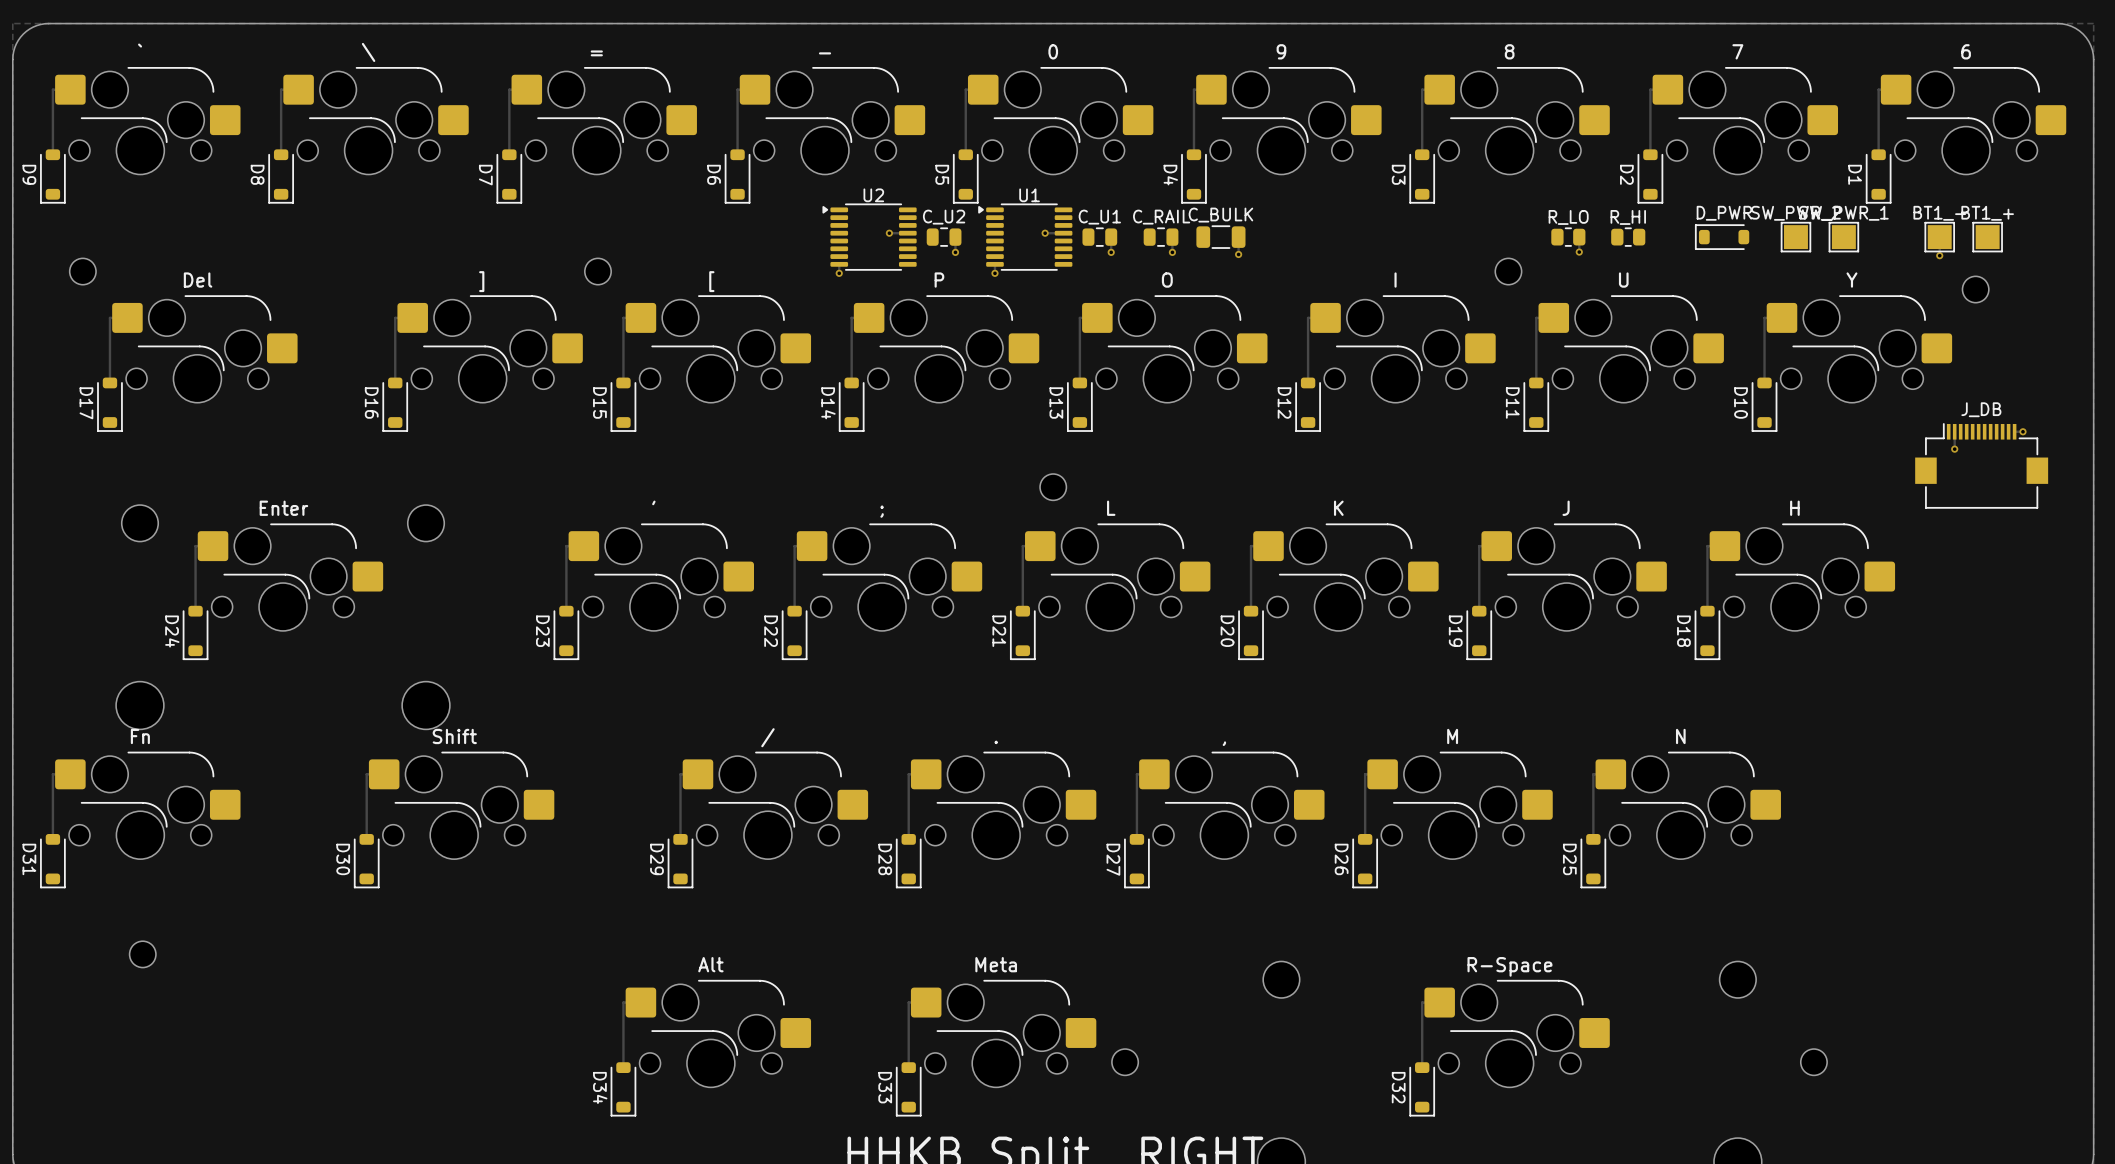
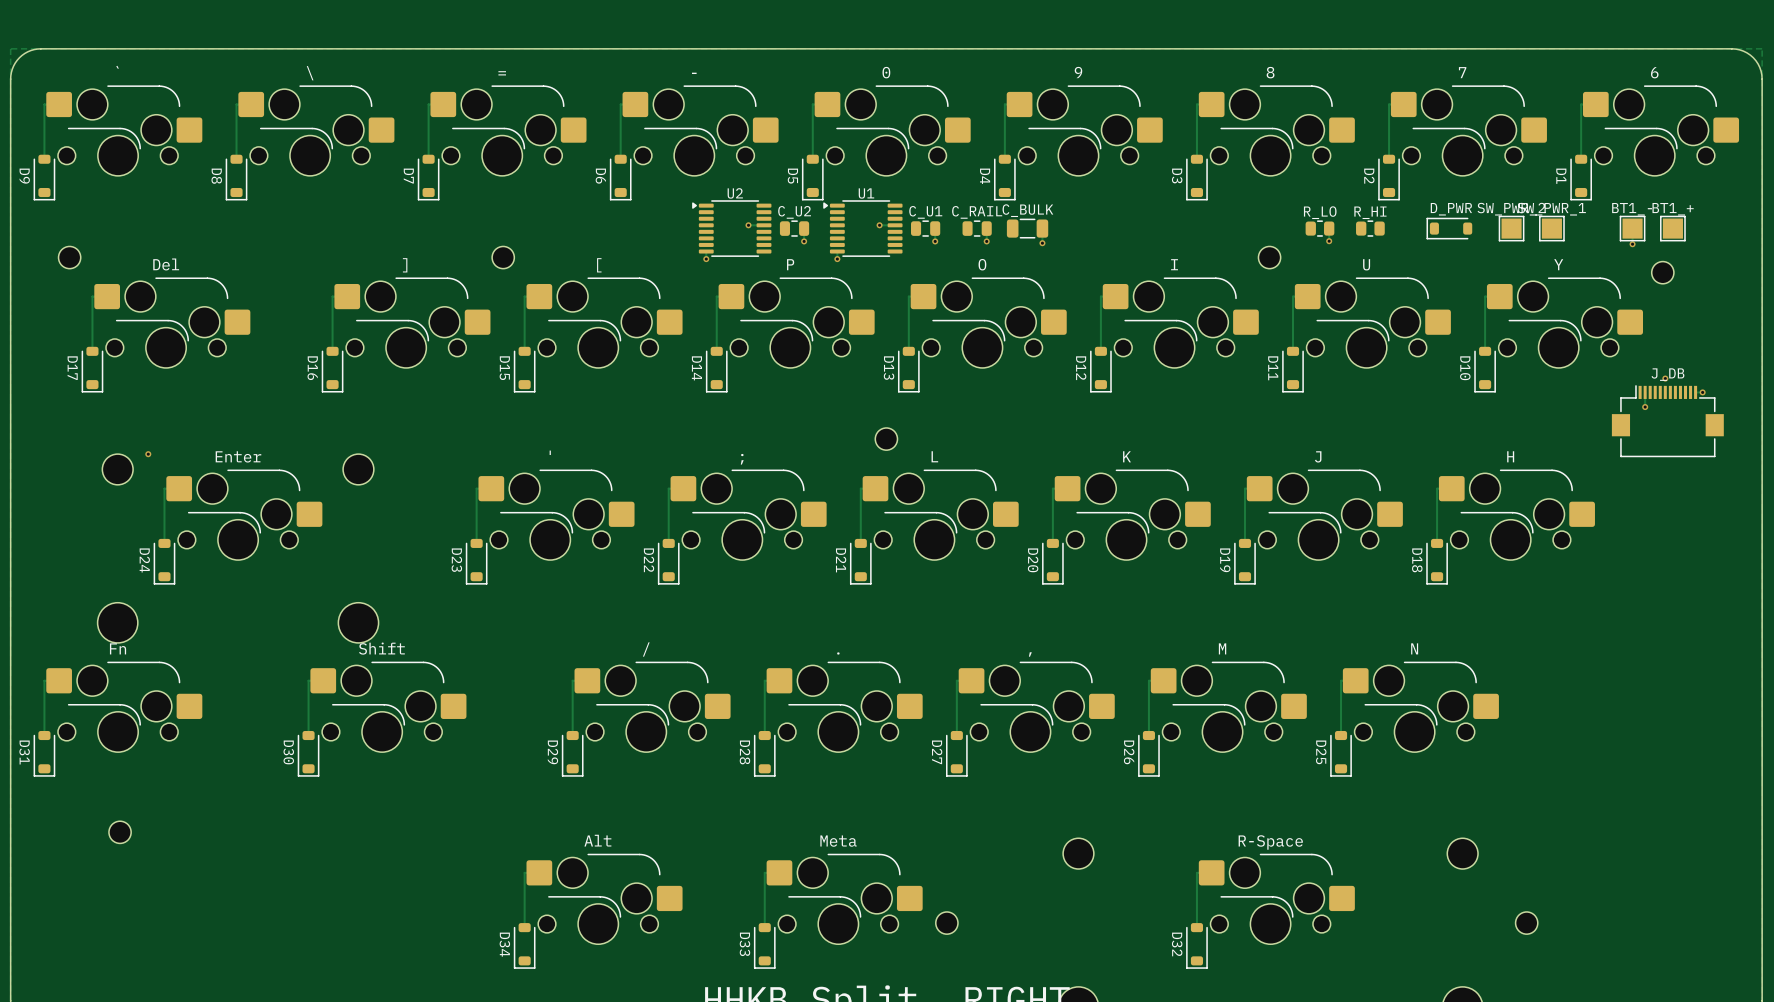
via: none -> (1665, 378)
via: none -> (148, 454)

